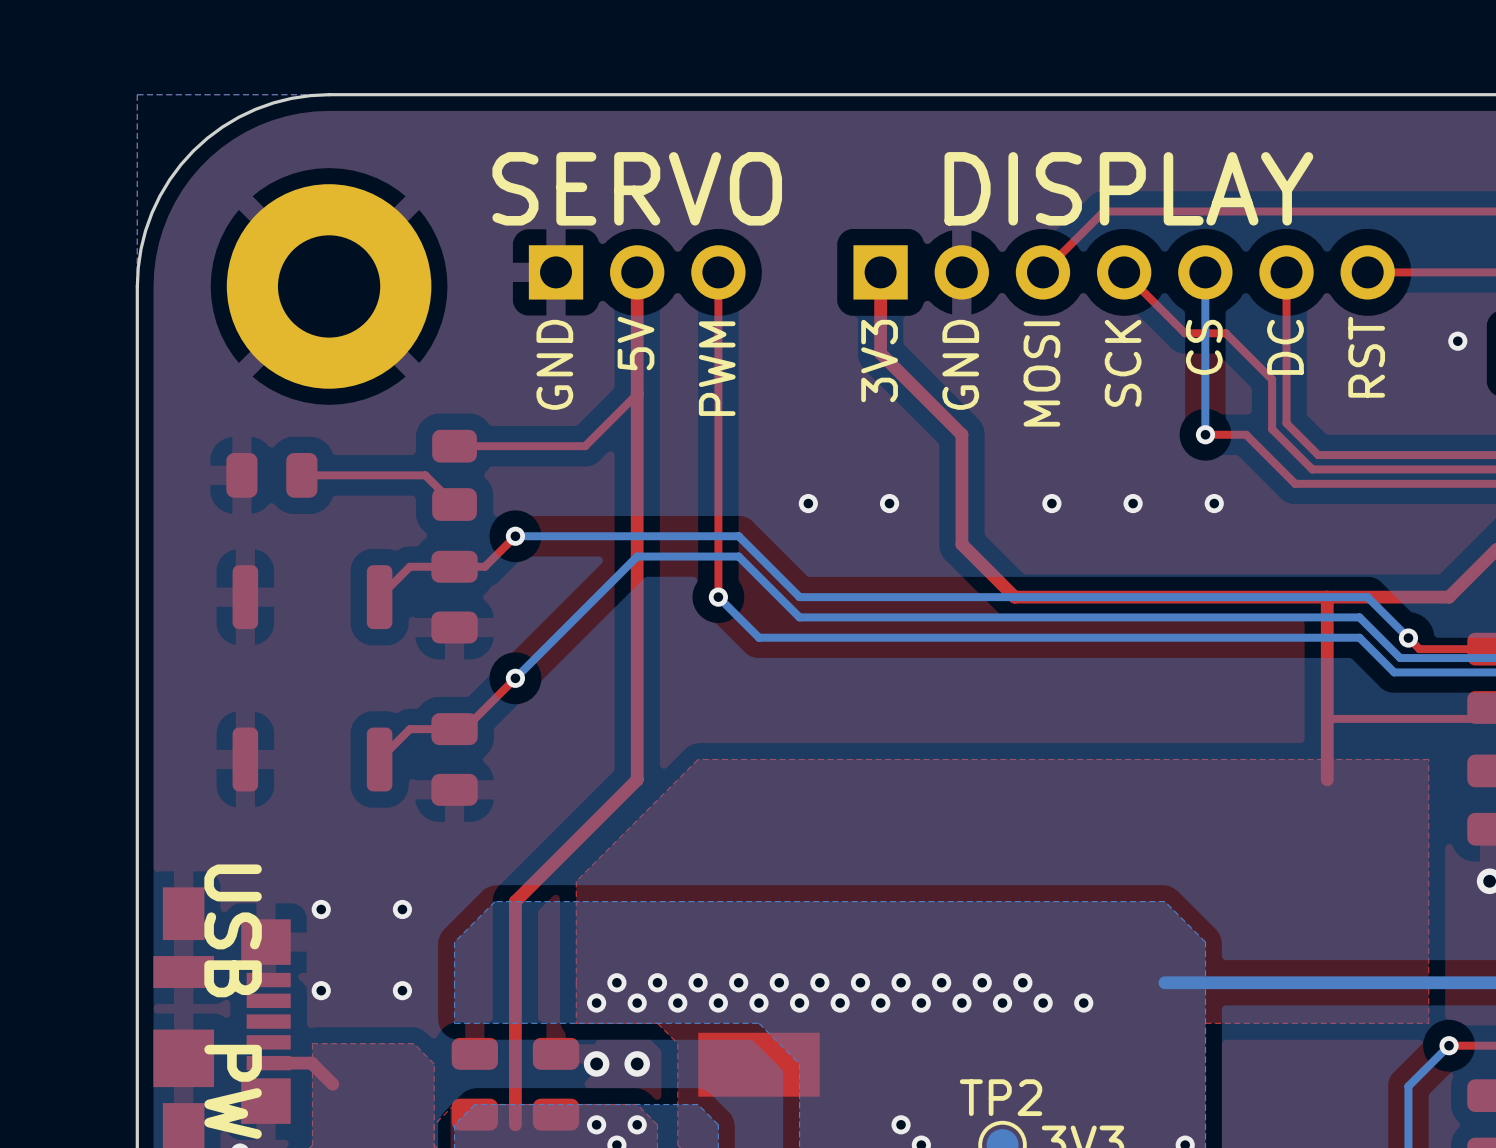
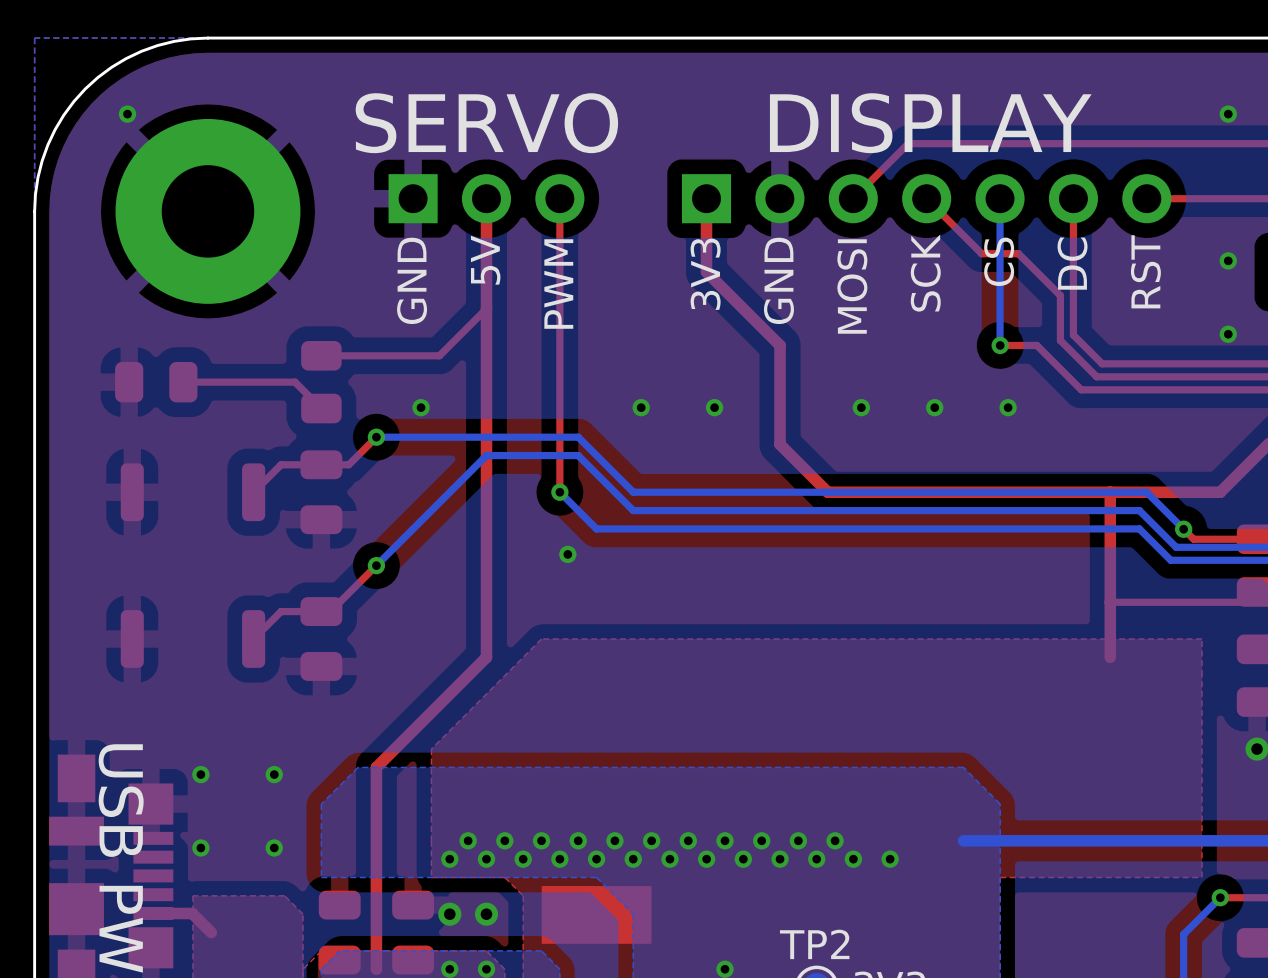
via: none -> (127, 114)
via: none -> (1228, 114)
via: none -> (1228, 334)
via: none -> (421, 407)
via: none -> (567, 554)

